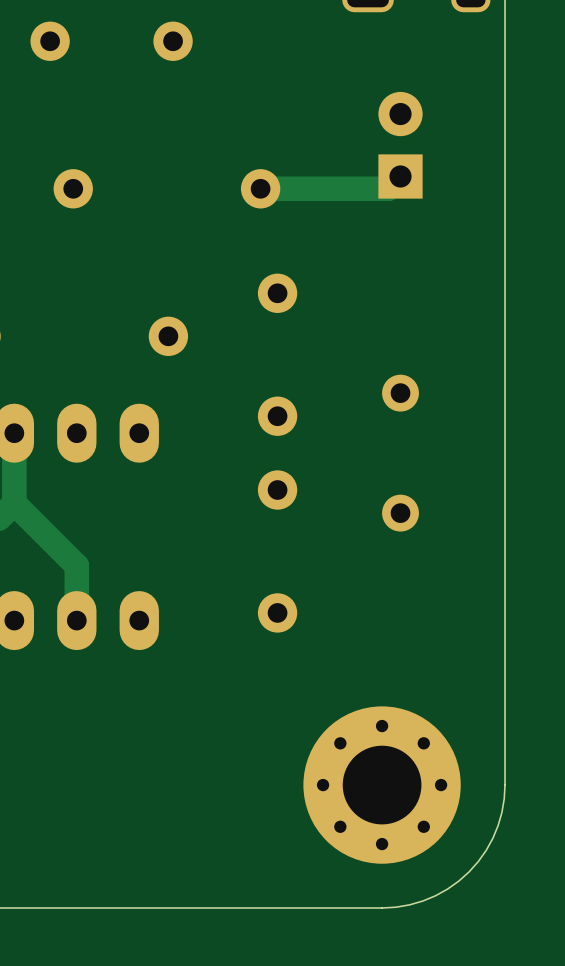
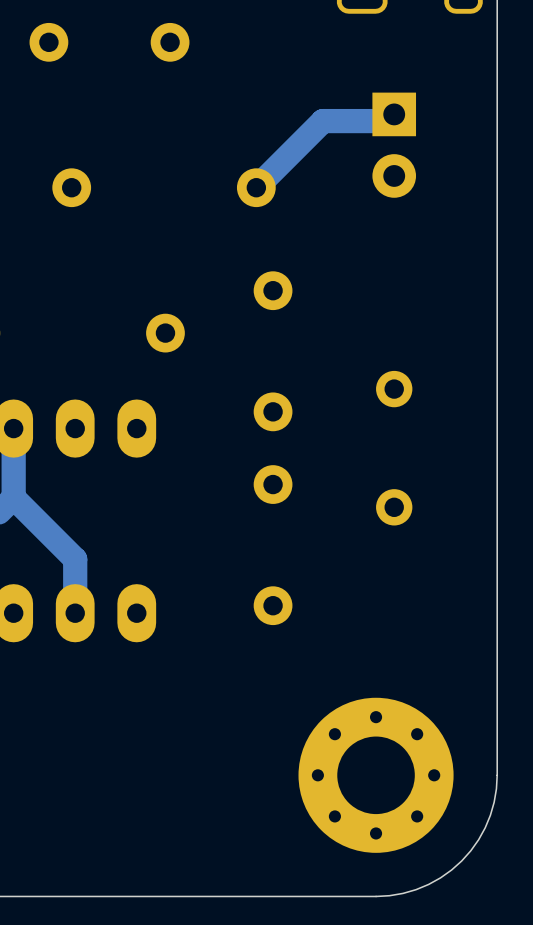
part rotation: 0° (400, 145) -> 180° (394, 145)
track: (400, 176) (388, 188) (260, 188) -> (394, 114) (387, 121) (322, 121) (256, 187)

